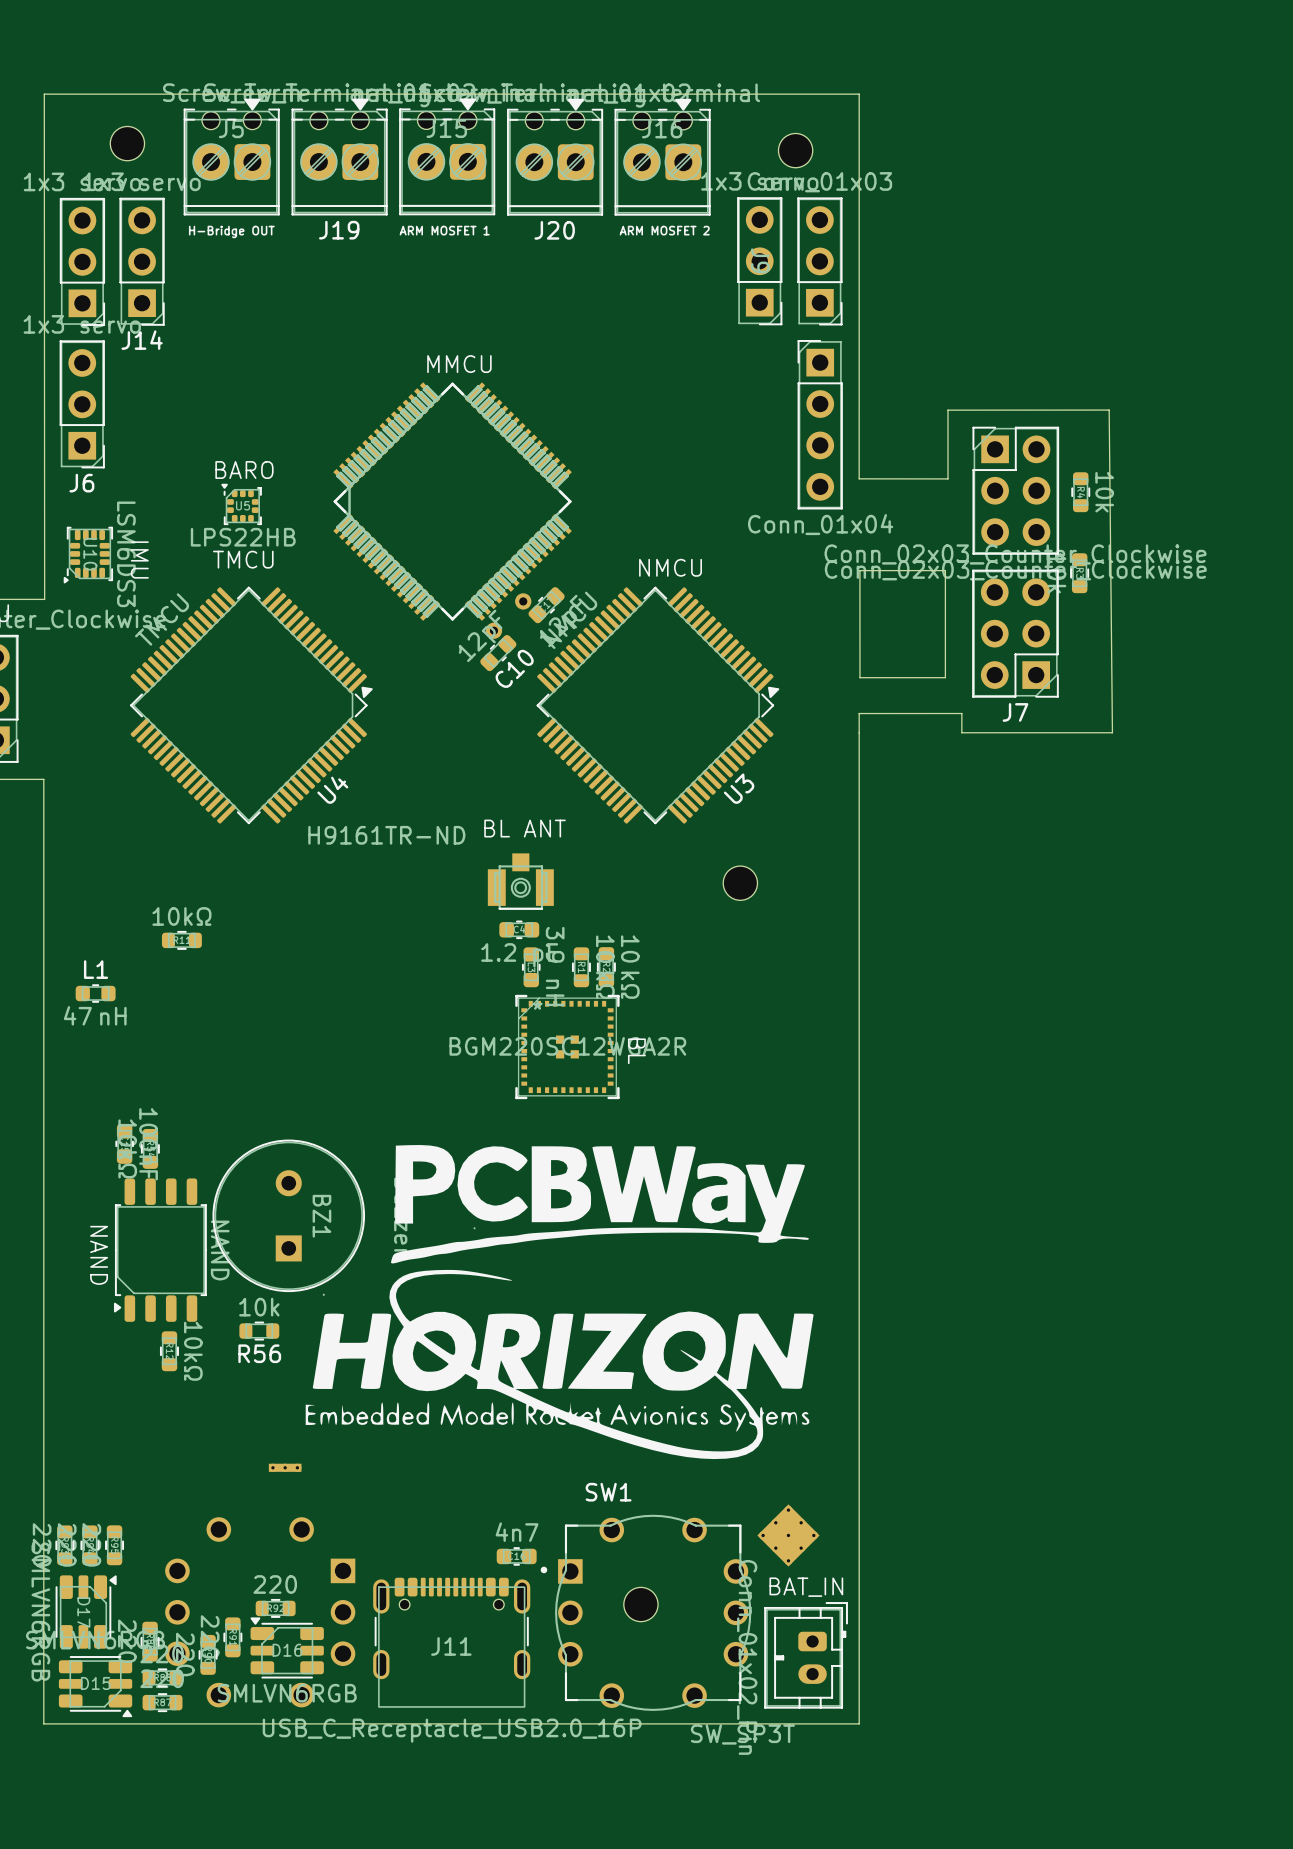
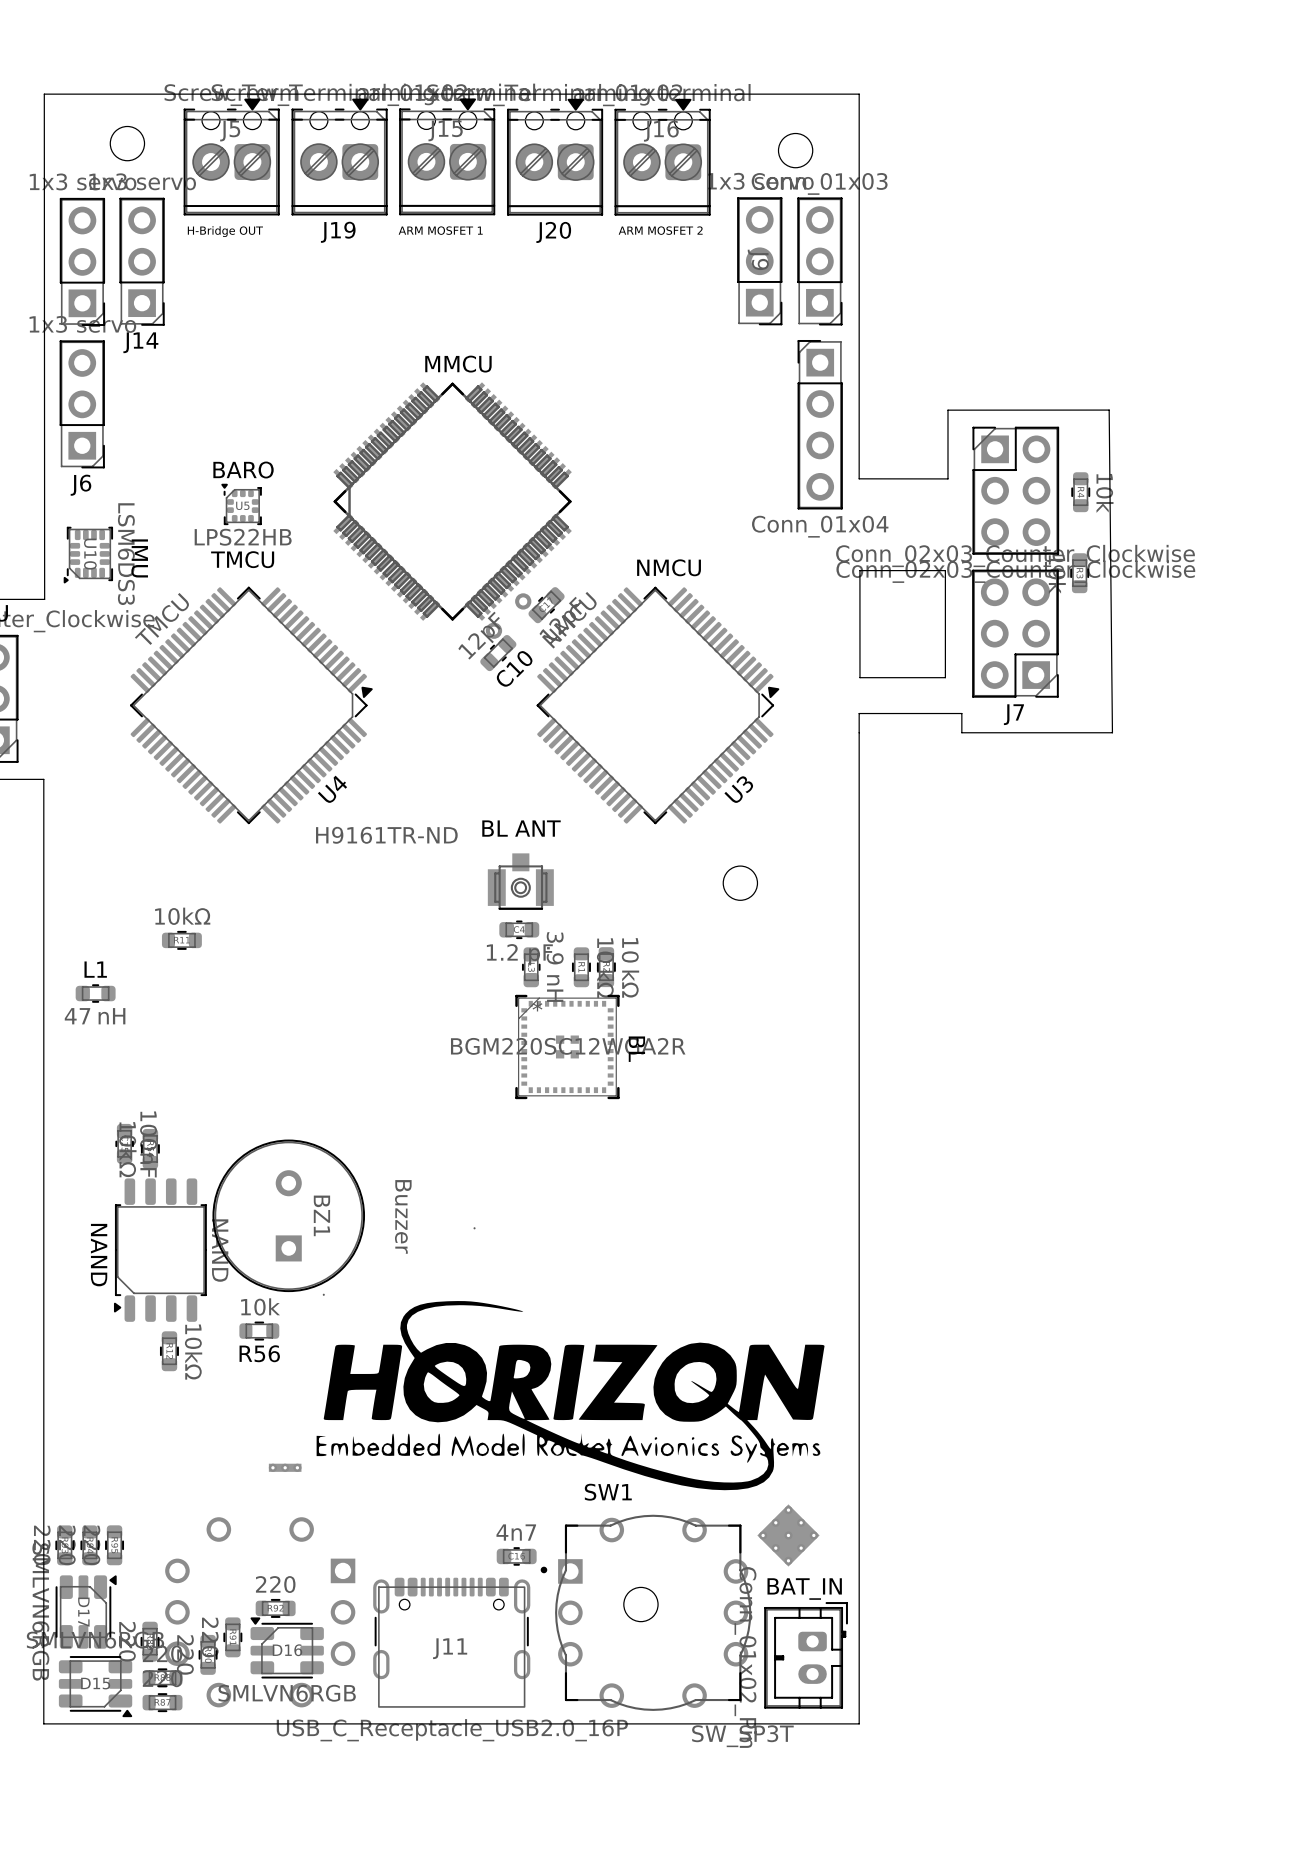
drawing: [390, 1145, 810, 1264] -> none
drawing position: (559, 1364) -> (570, 1395)

